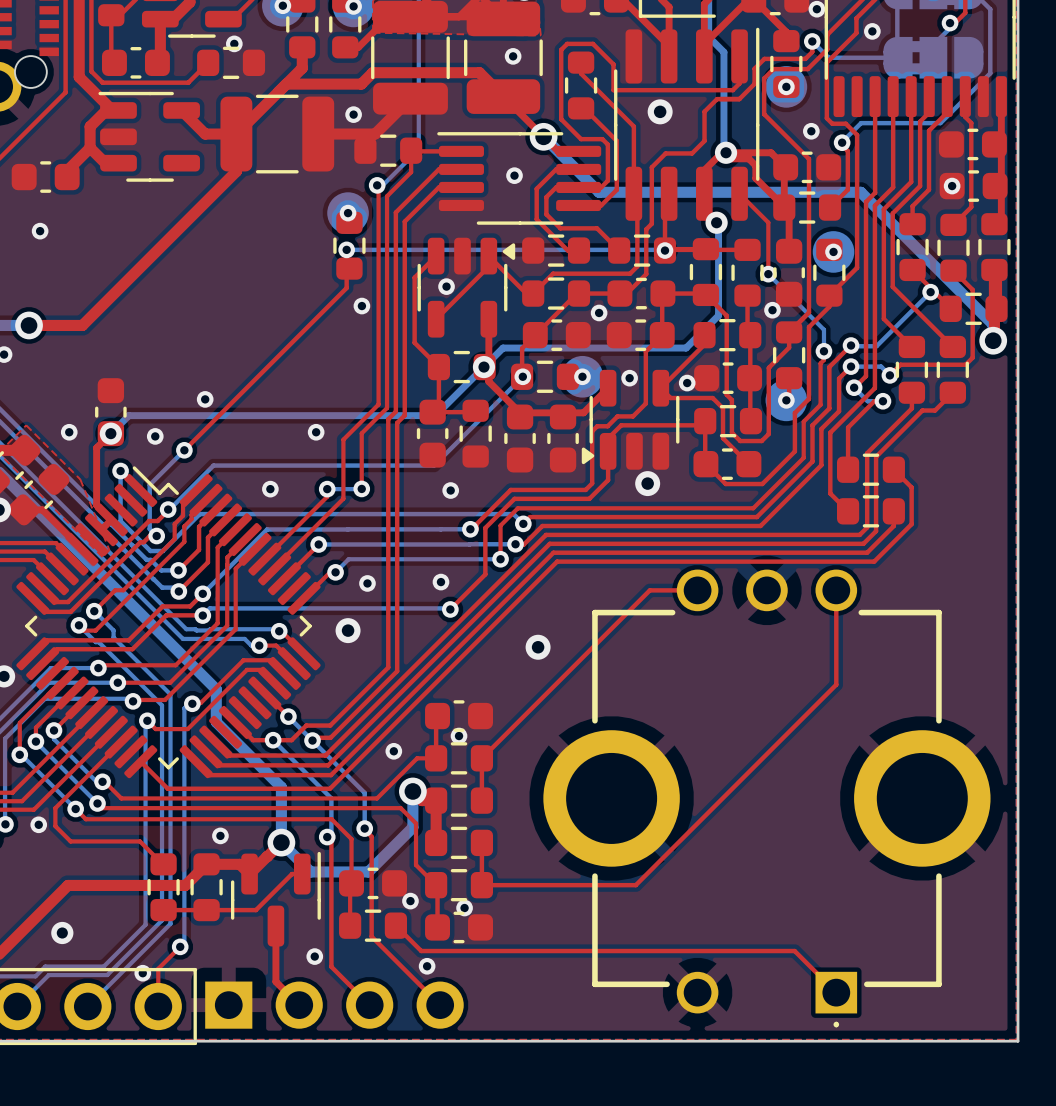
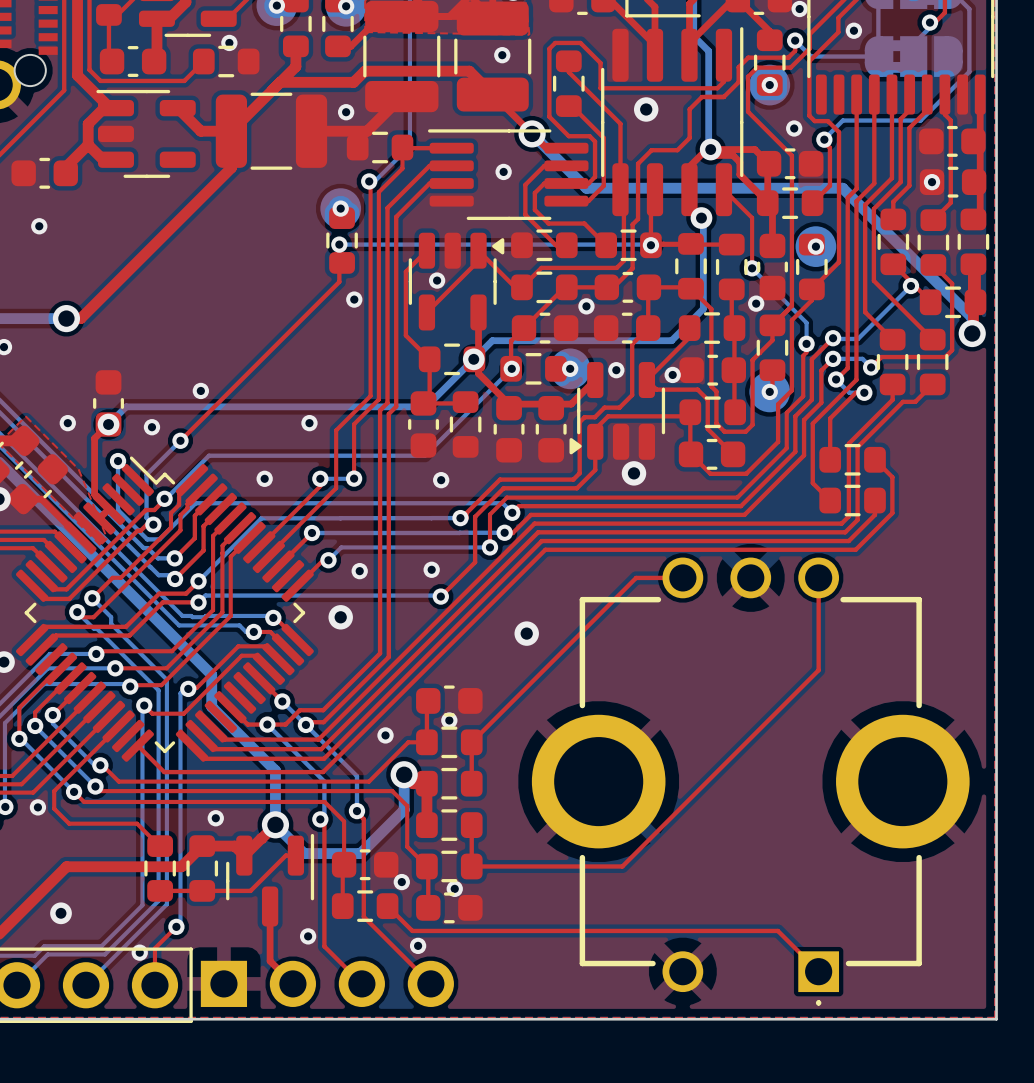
top track: (29, 325) (67, 325) -> none
bottom track: none -> (28, 318) (66, 318)
via position: (29, 325) -> (66, 318)

